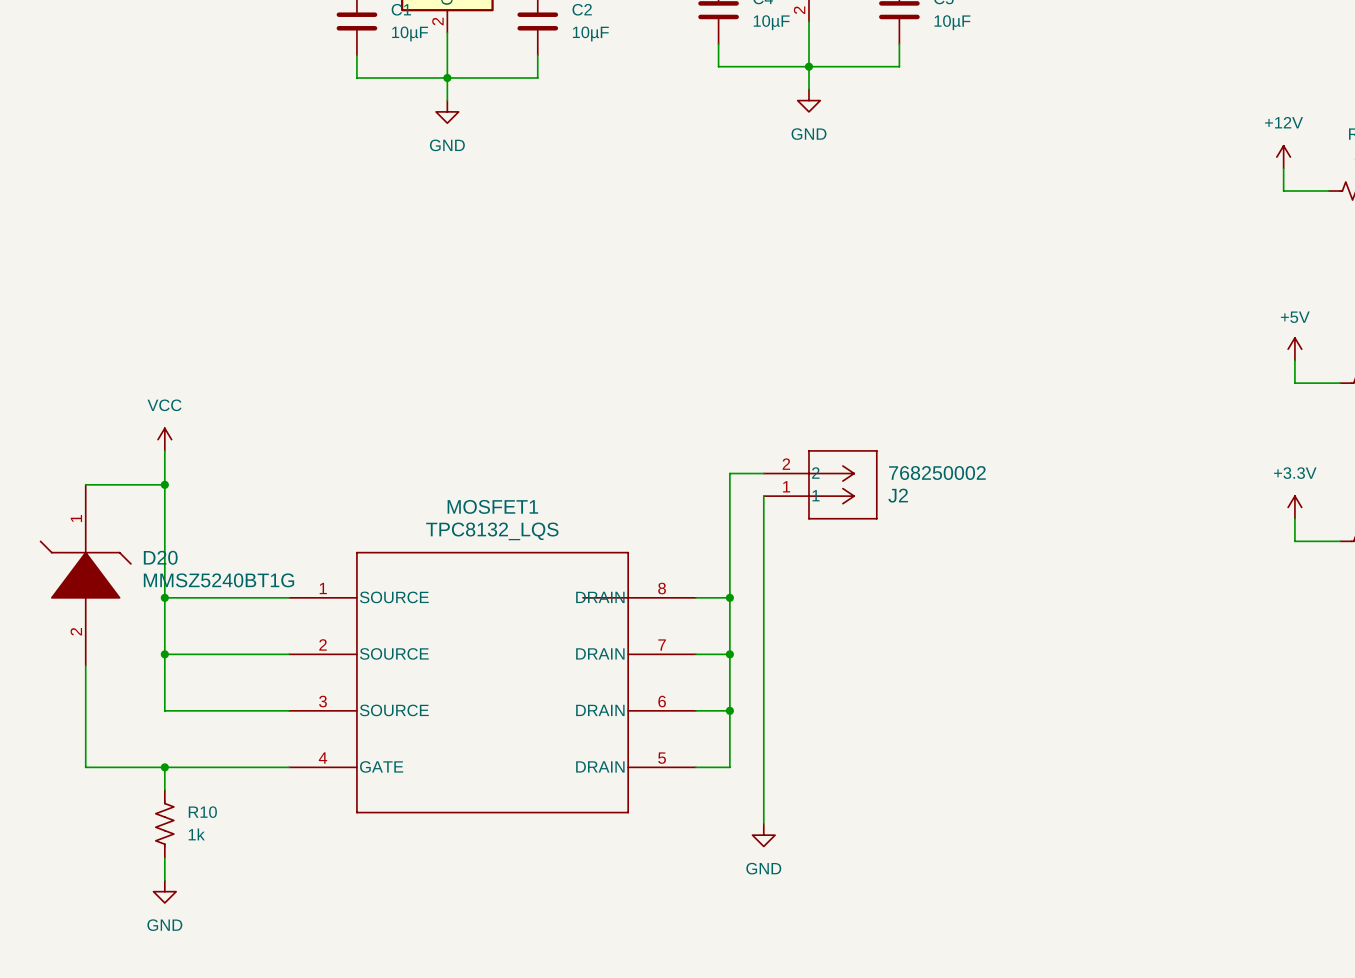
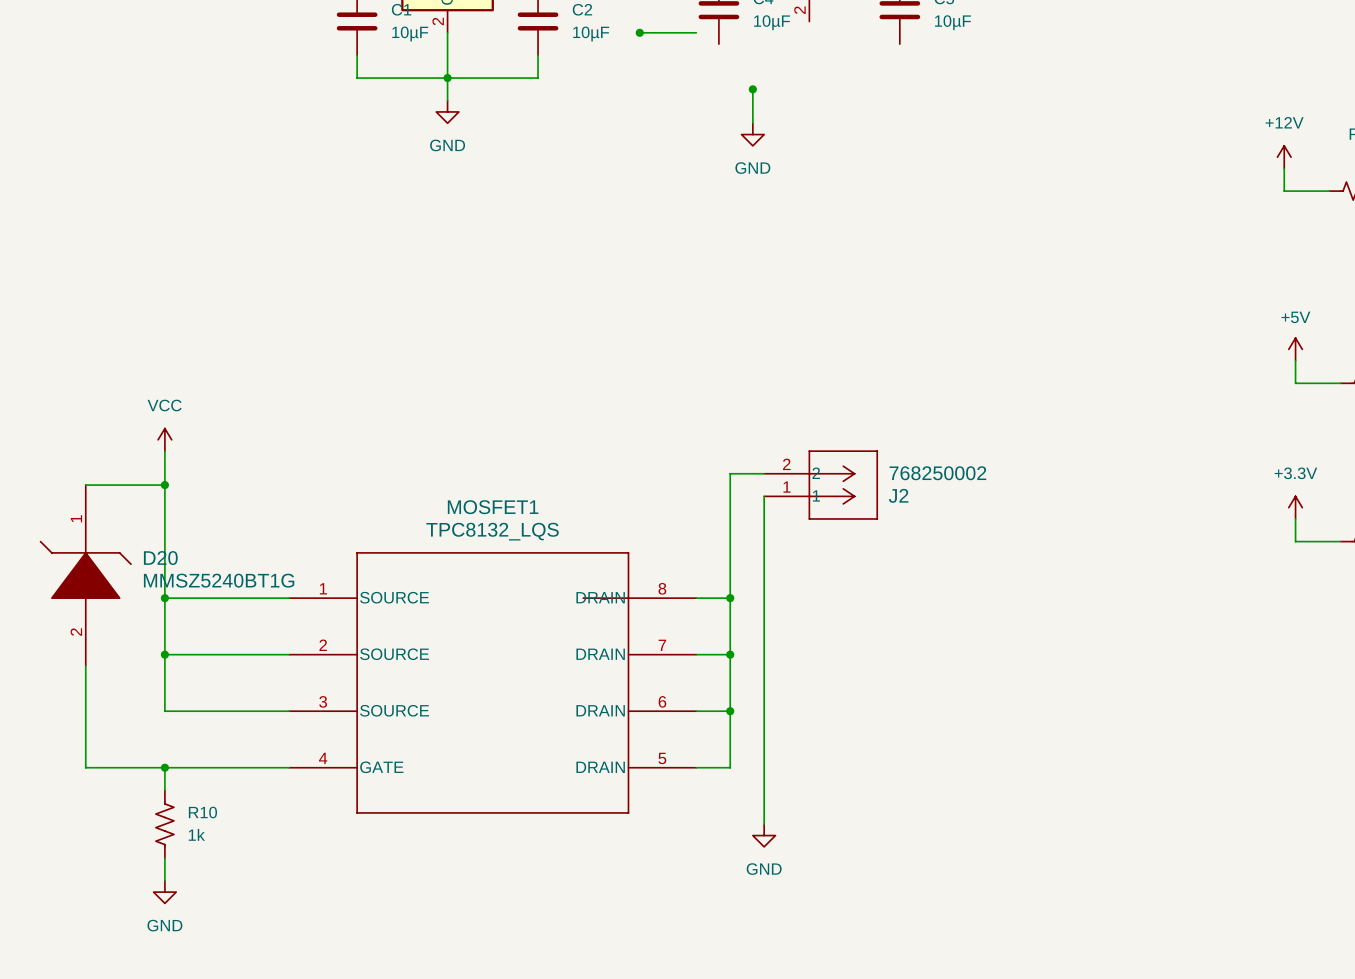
wire: (808, 21) (808, 89) -> none
wire: none -> (639, 32) (696, 32)
junction: none -> (639, 32)
wire: (718, 44) (718, 66) (899, 66) (899, 44) -> none
junction: (808, 66) -> none
wire: none -> (752, 89) (752, 123)
junction: none -> (752, 89)
power symbol position: GND (808, 100) -> GND (752, 134)

